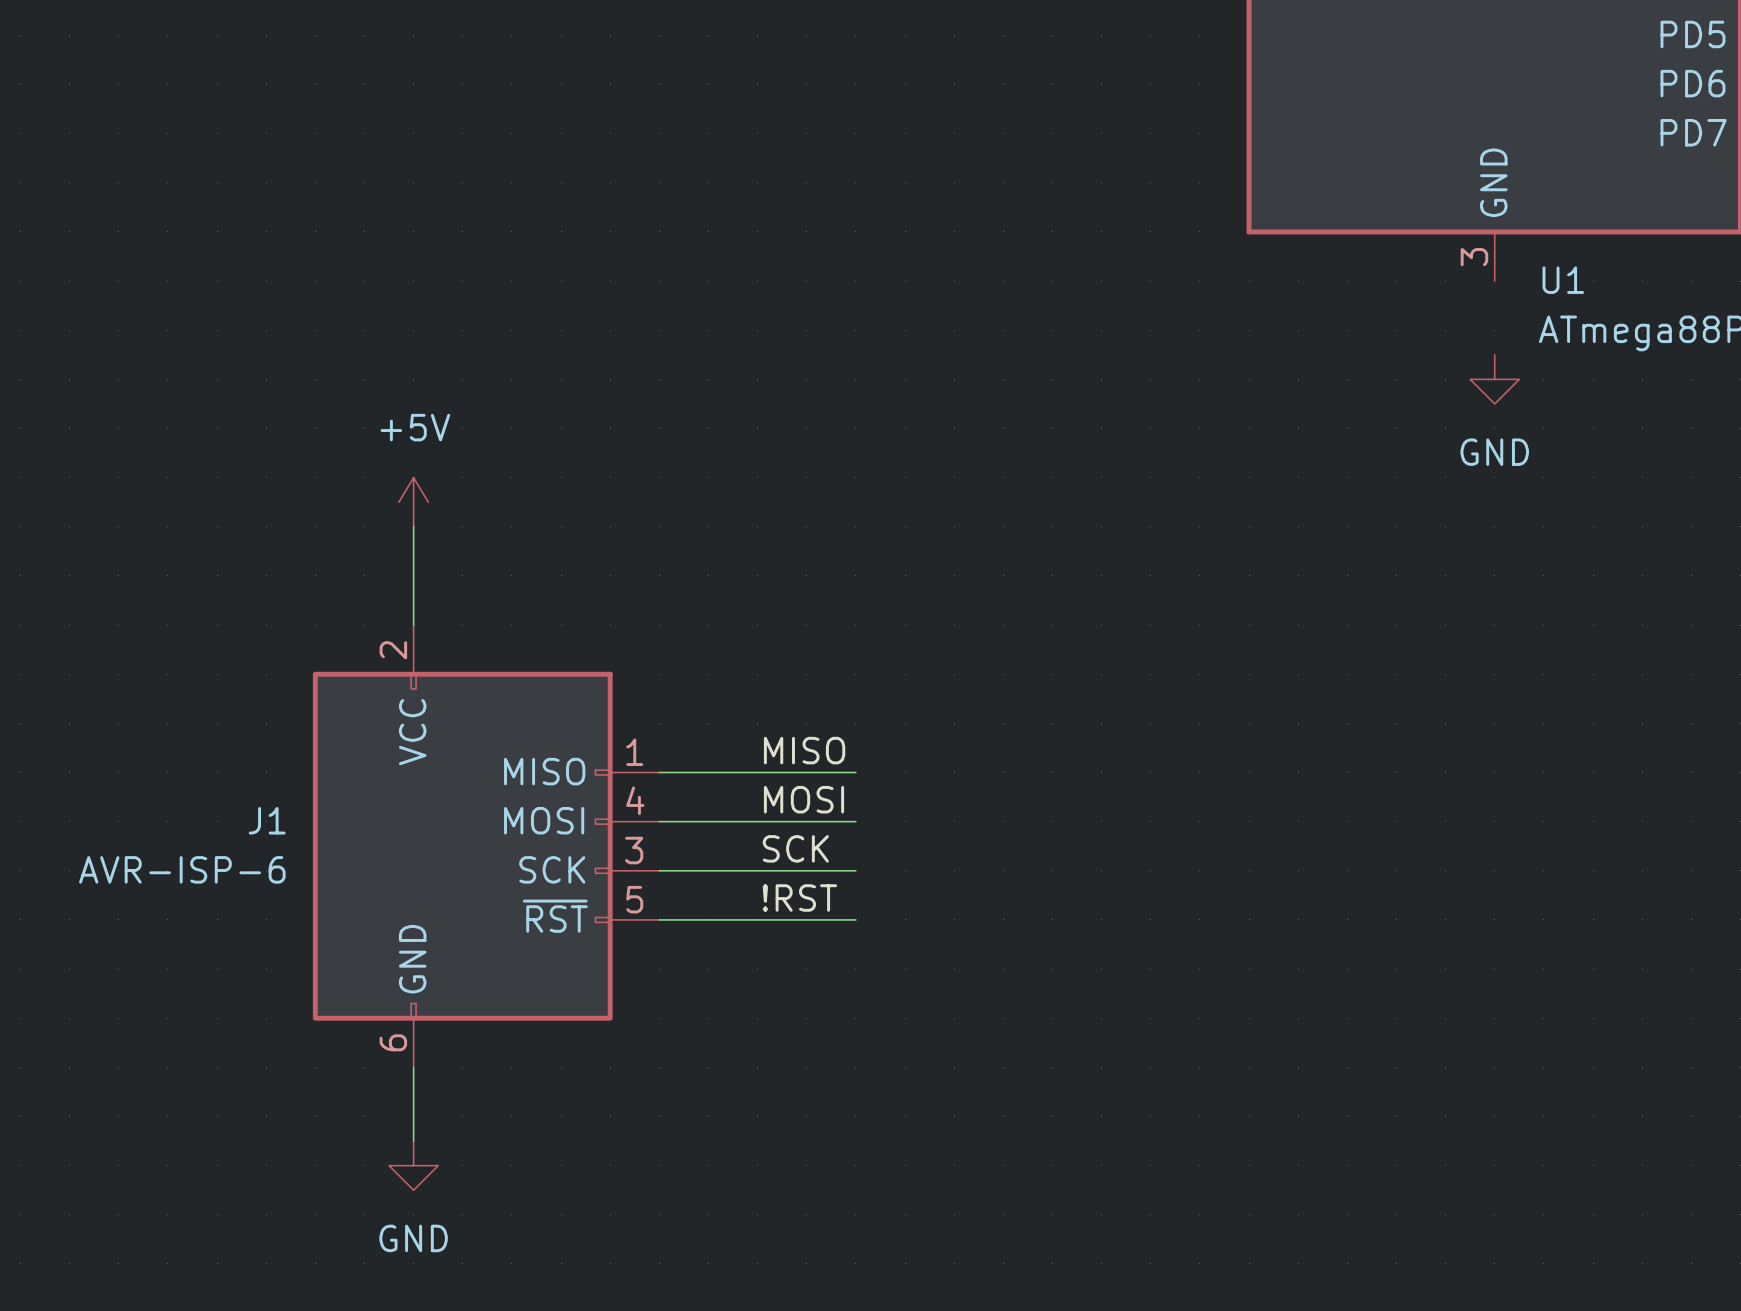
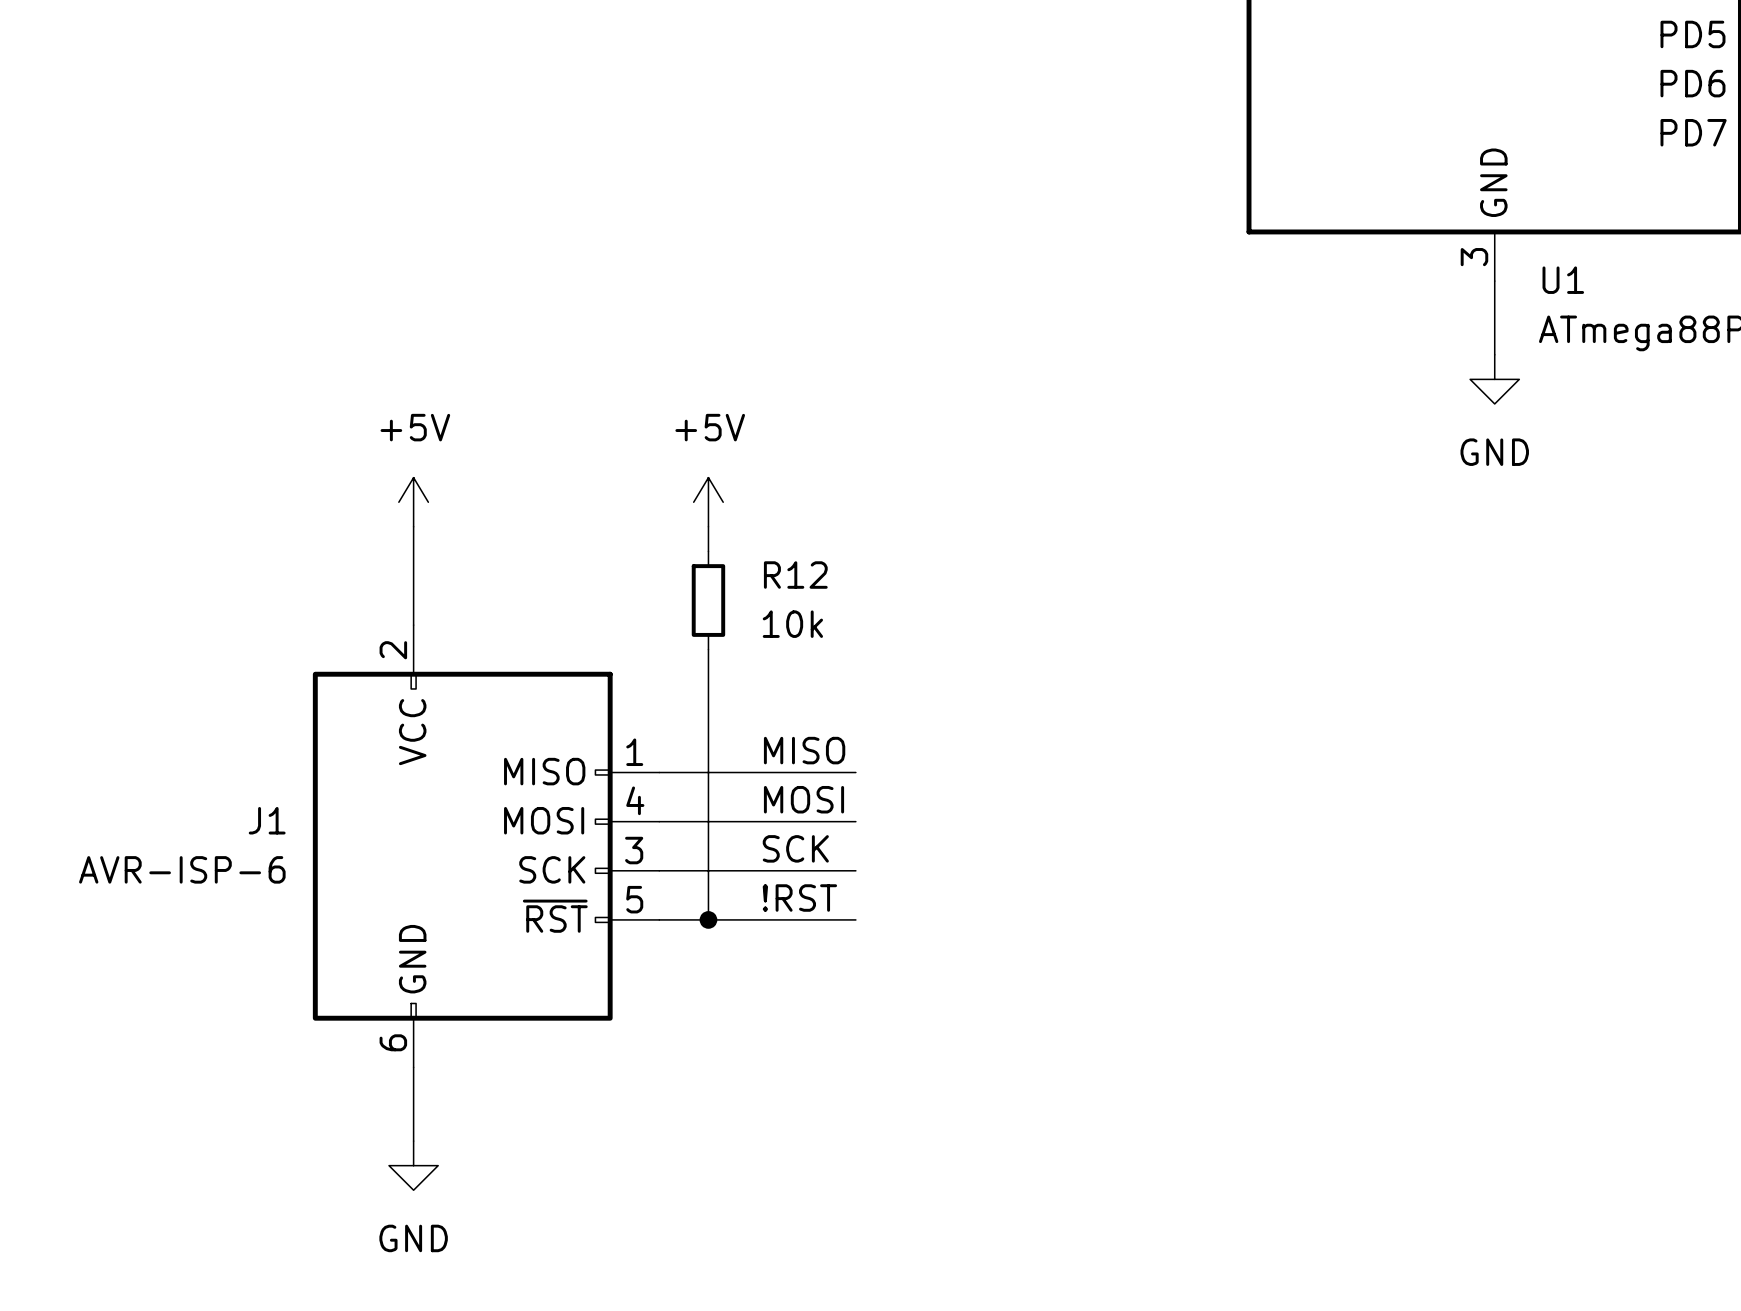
wire: none -> (1494, 281) (1494, 354)
power symbol: none -> +5V (708, 502)
wire: none -> (708, 526) (708, 551)
R12: none -> 10k (708, 600)
wire: none -> (708, 649) (708, 919)
junction: none -> (708, 919)

